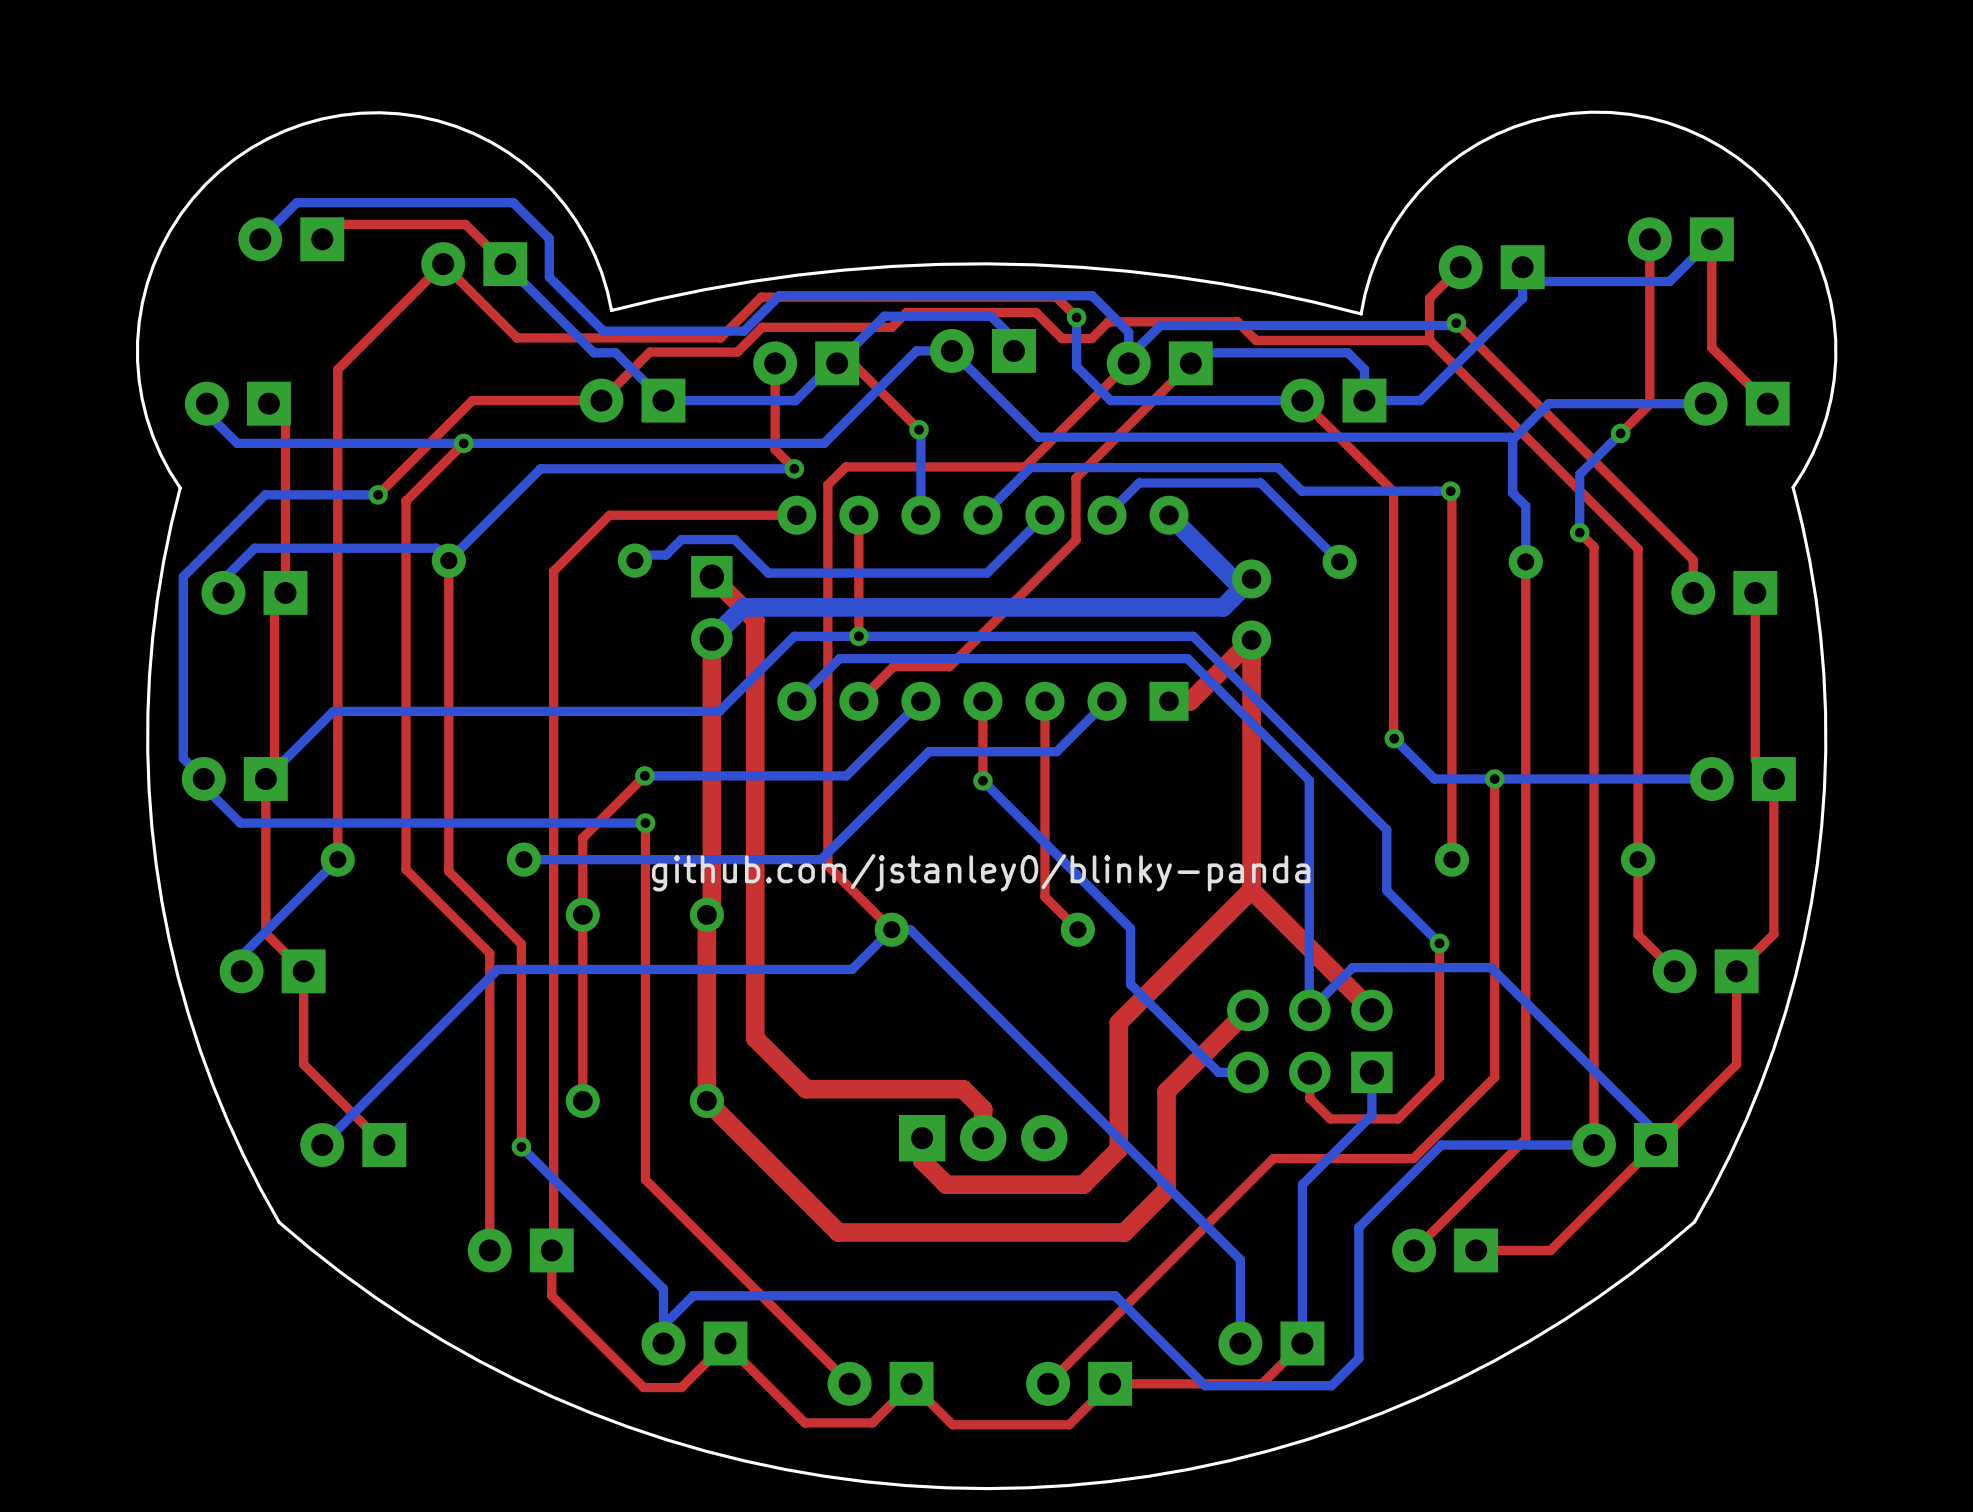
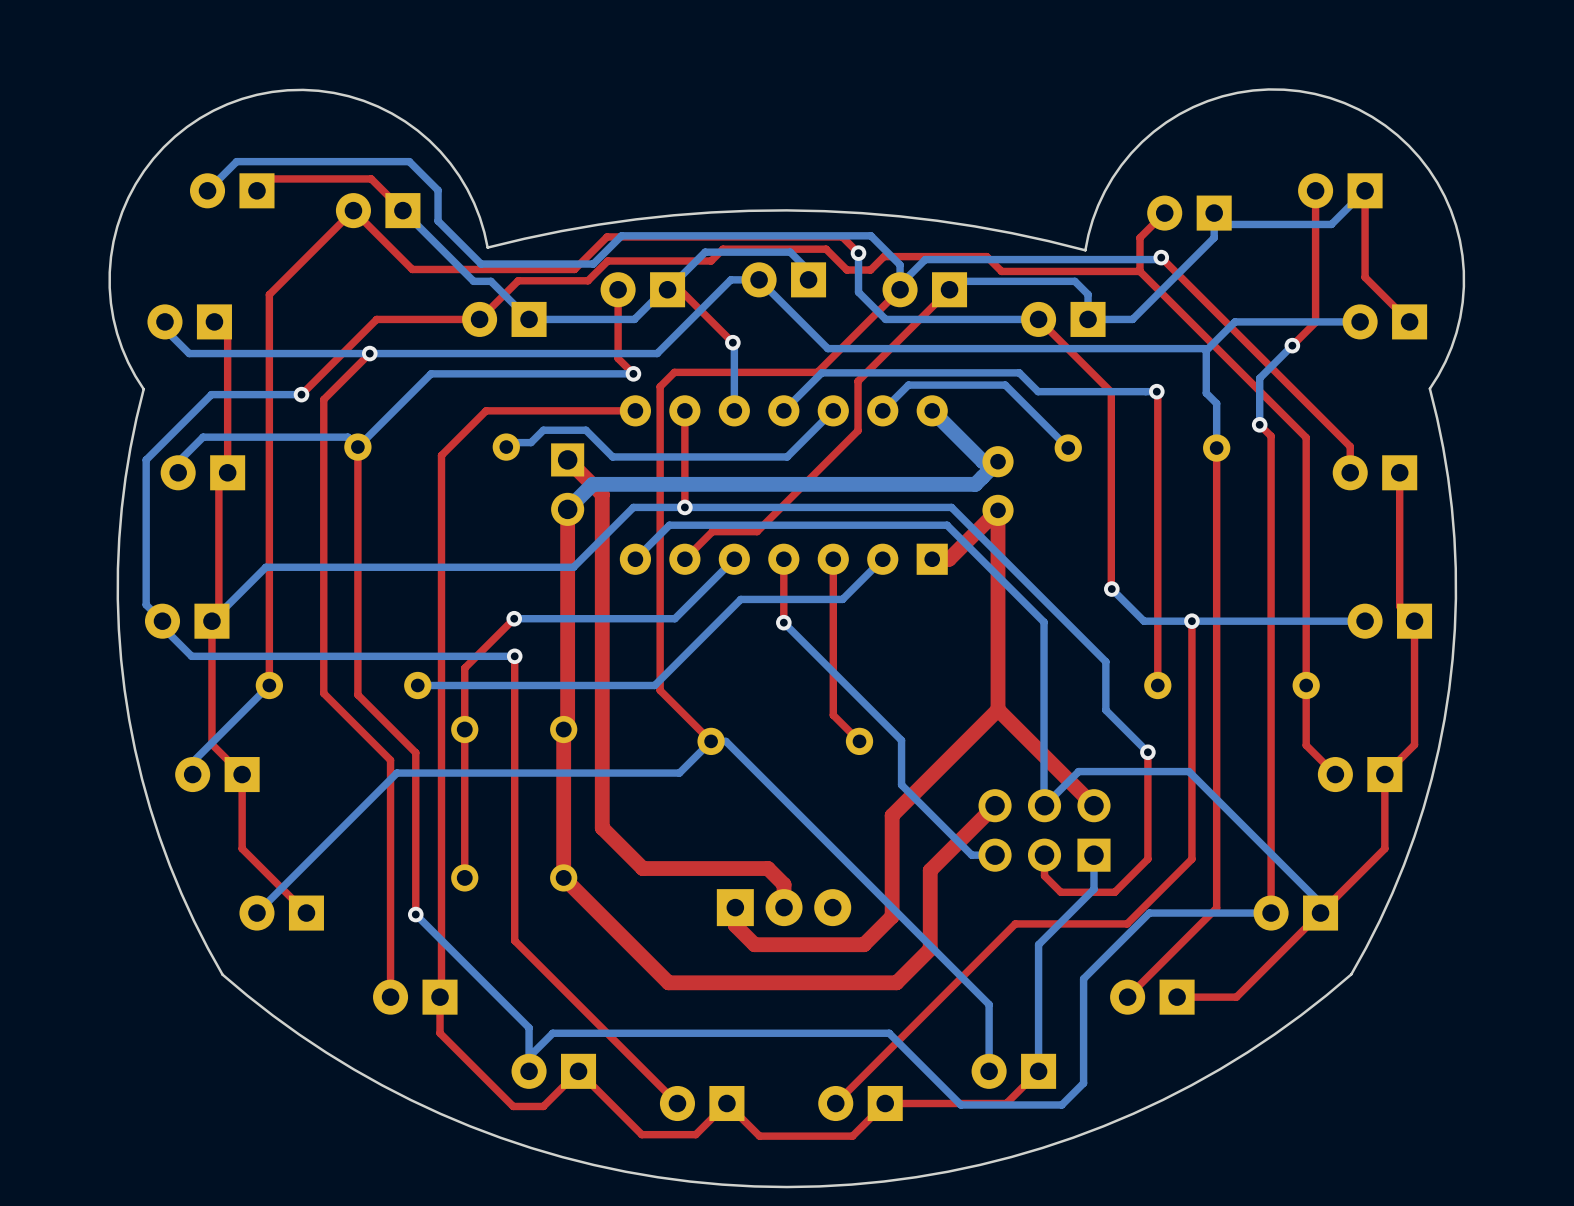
text: github.com/jstanley0/blinky-panda (981, 872) -> none

